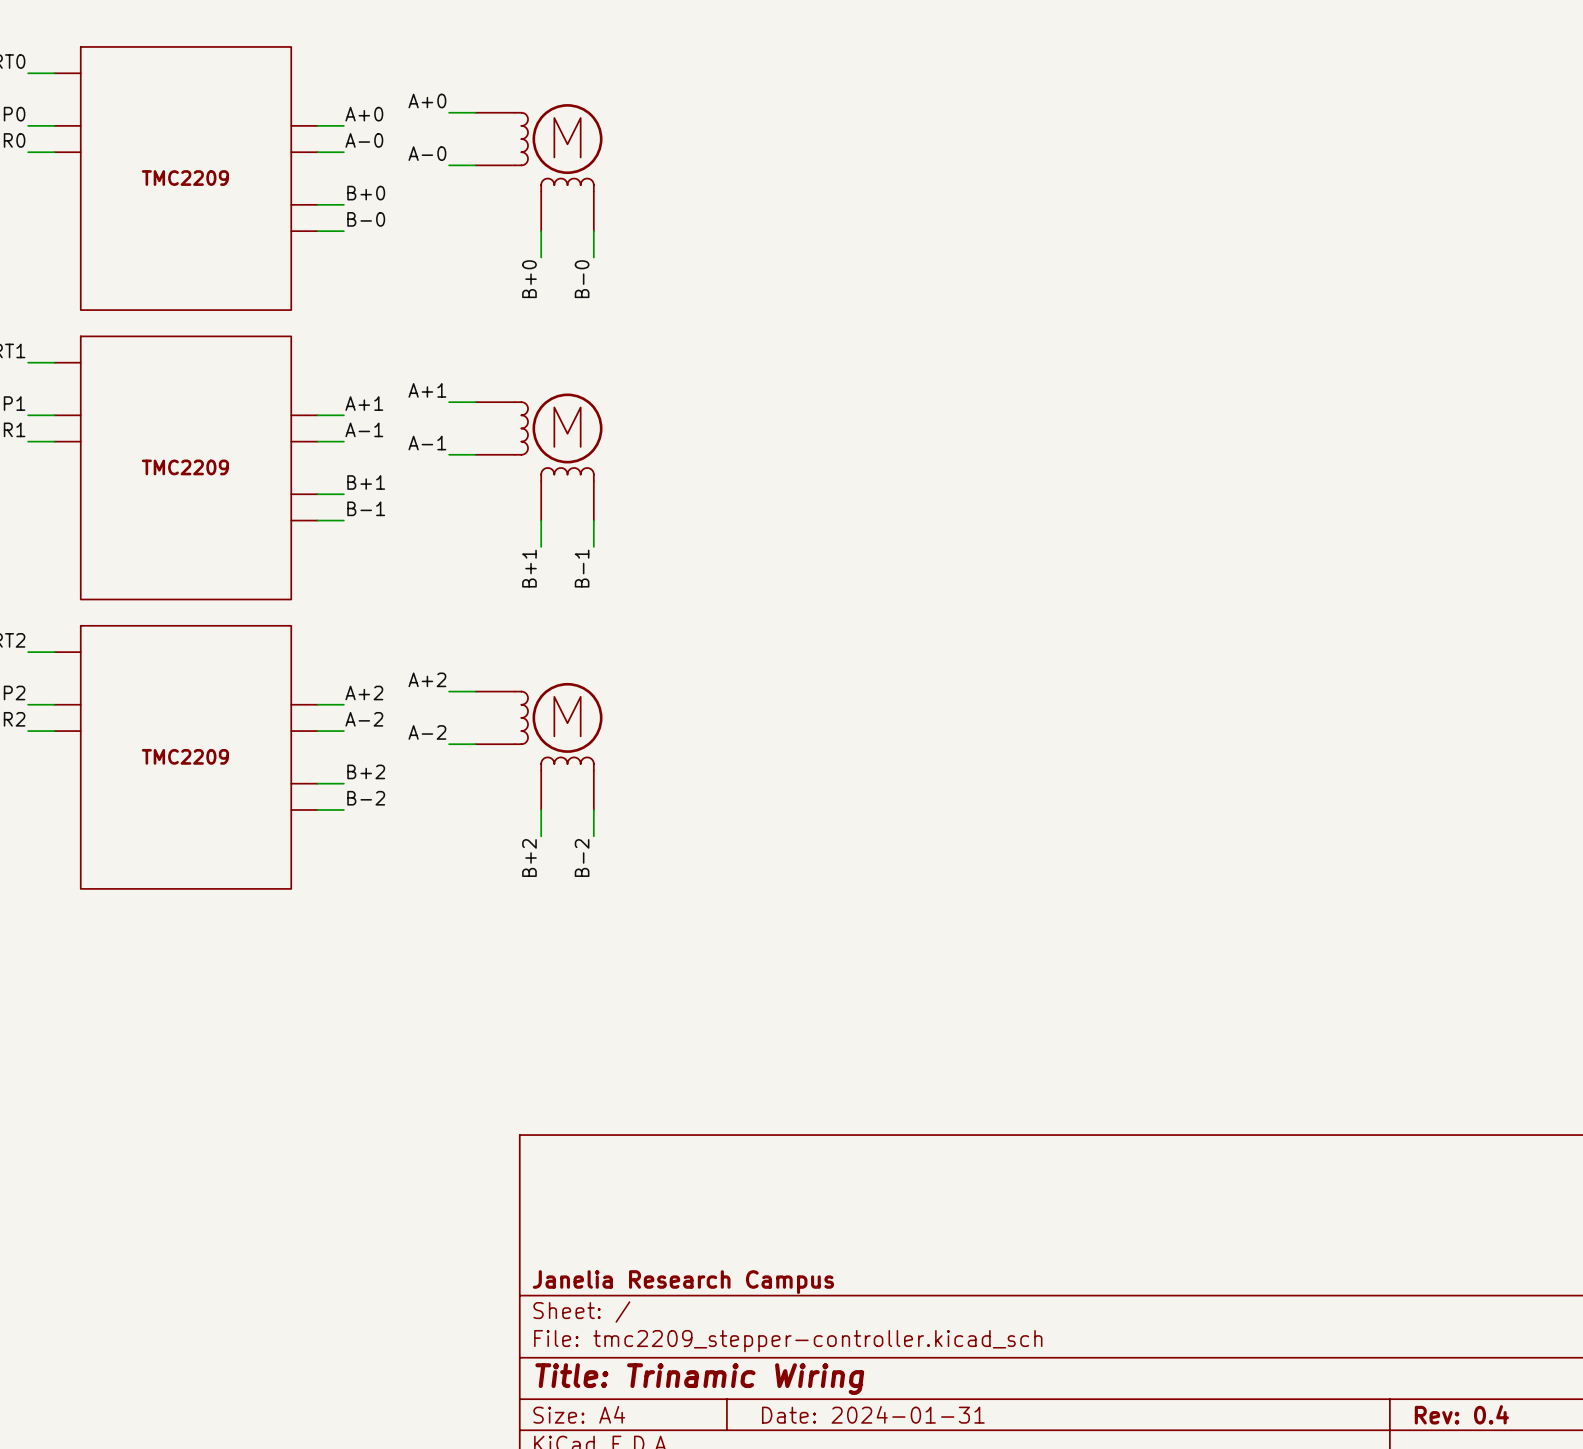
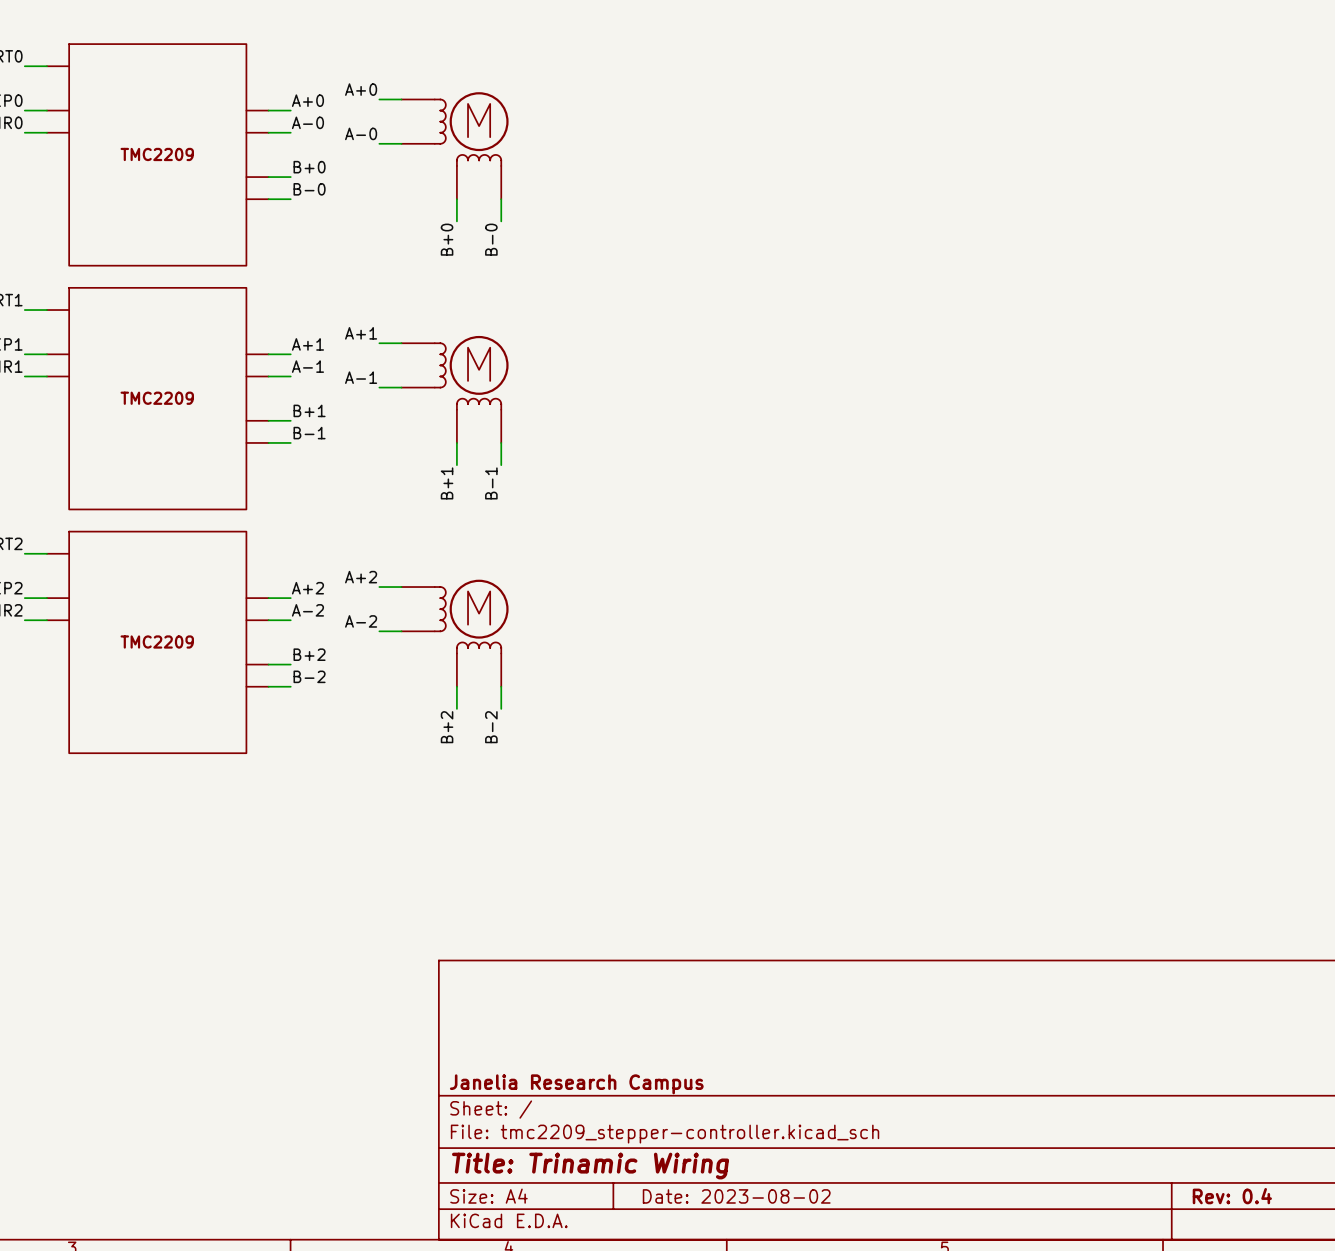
title block: Date: 2024-01-31 (873, 1414) -> Date: 2023-08-02 (736, 1196)

